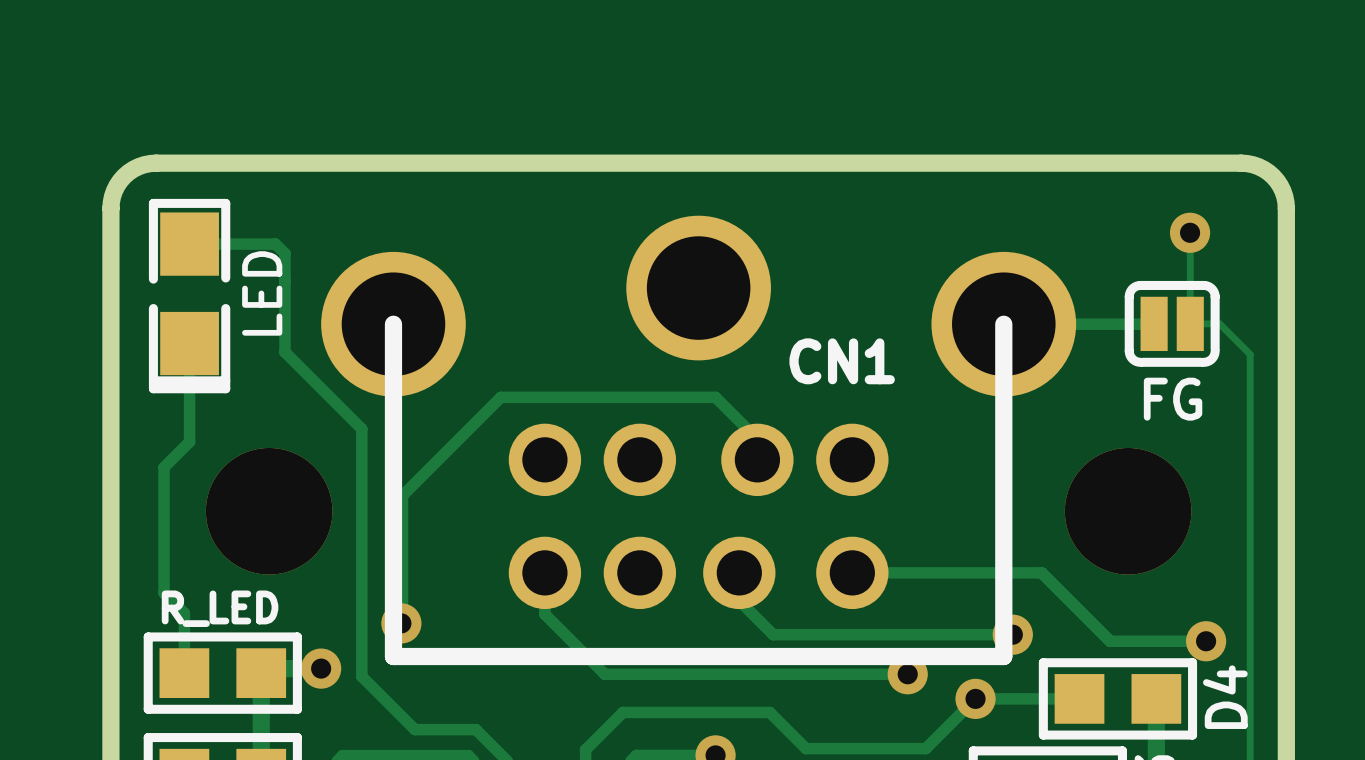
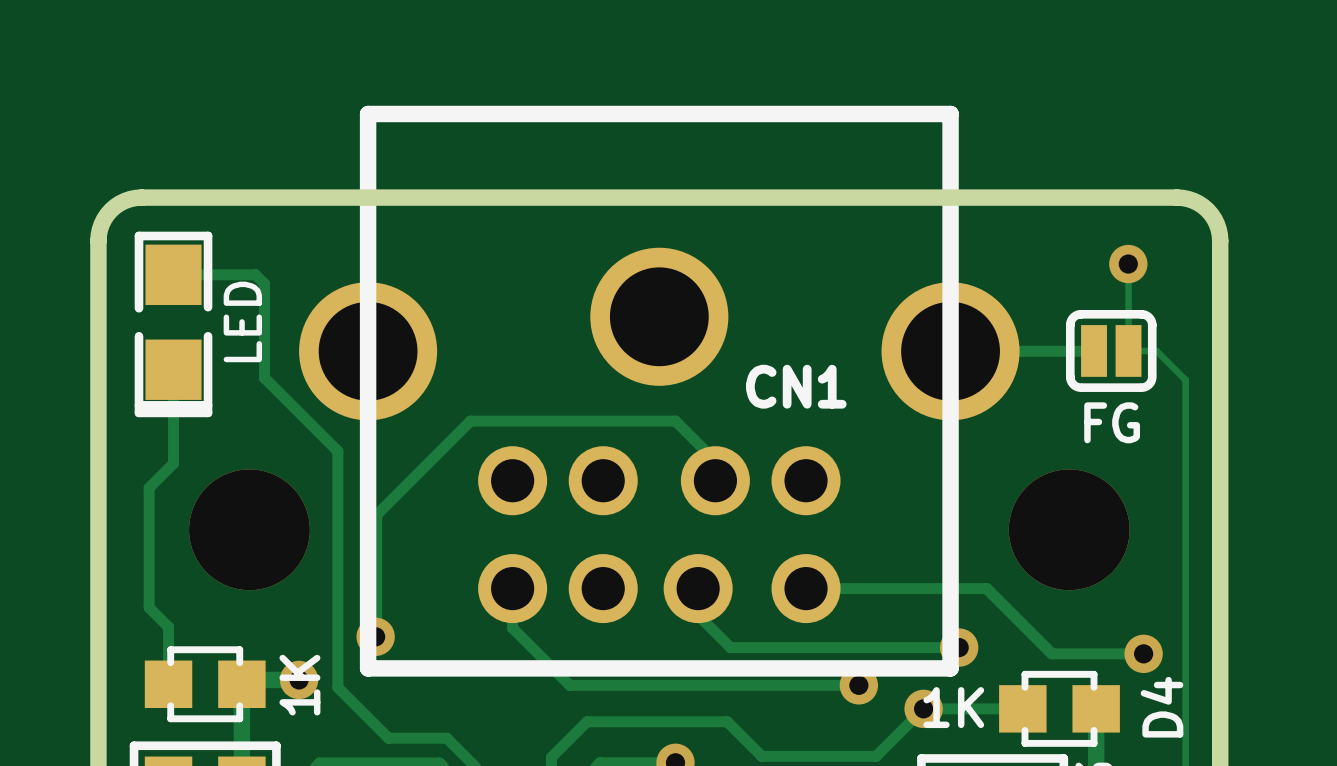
CN1 footprint: [321, 215, 1077, 666] -> [299, 105, 1020, 677]
part value: R_LED (220, 608) -> 1K (299, 685)
part footprint: [143, 632, 302, 714] -> [144, 646, 266, 723]
part footprint: [1038, 658, 1198, 740] -> [999, 670, 1120, 747]
part value: none -> 1K (953, 707)

